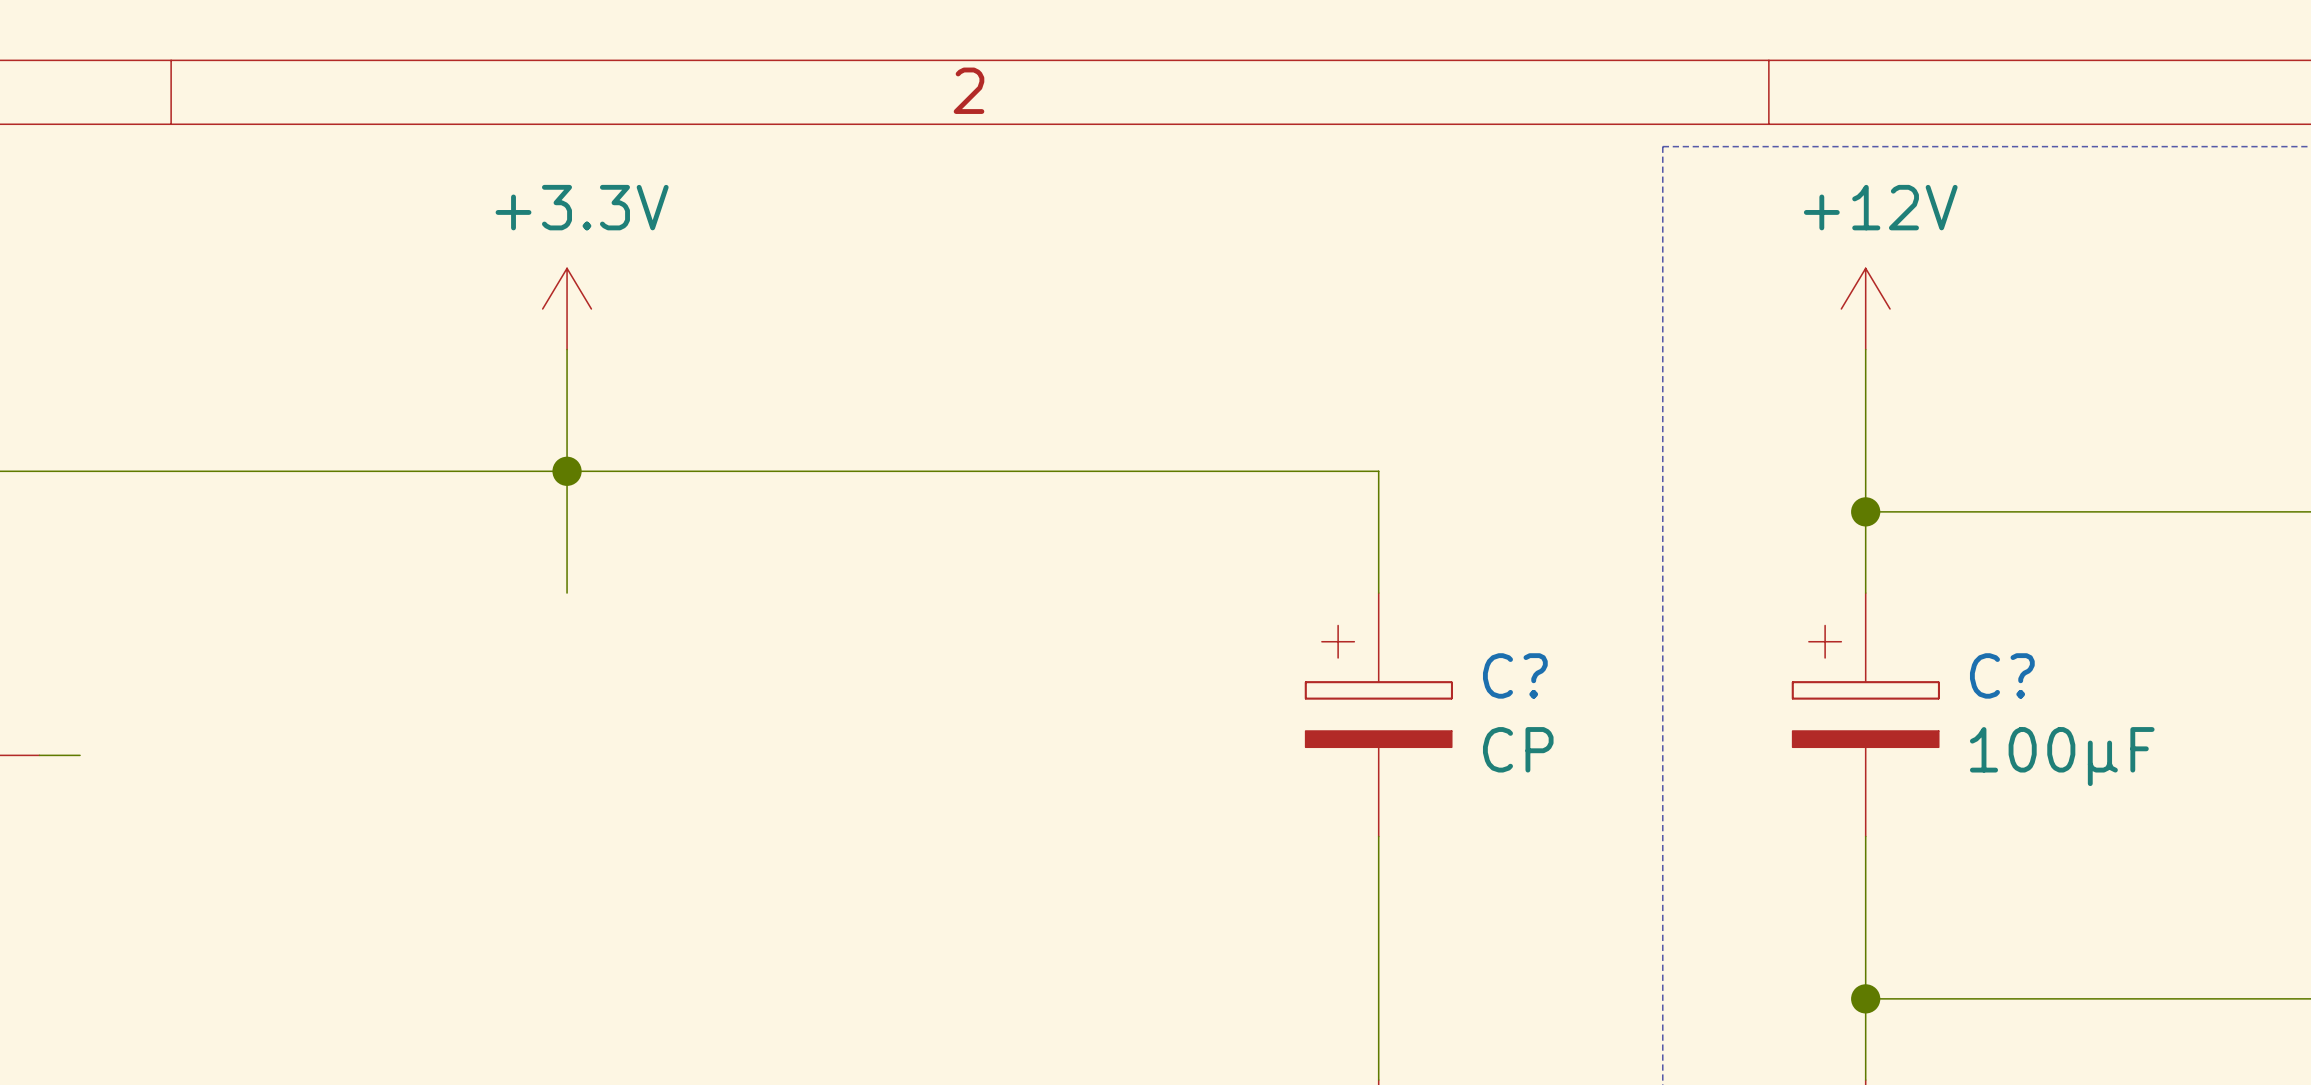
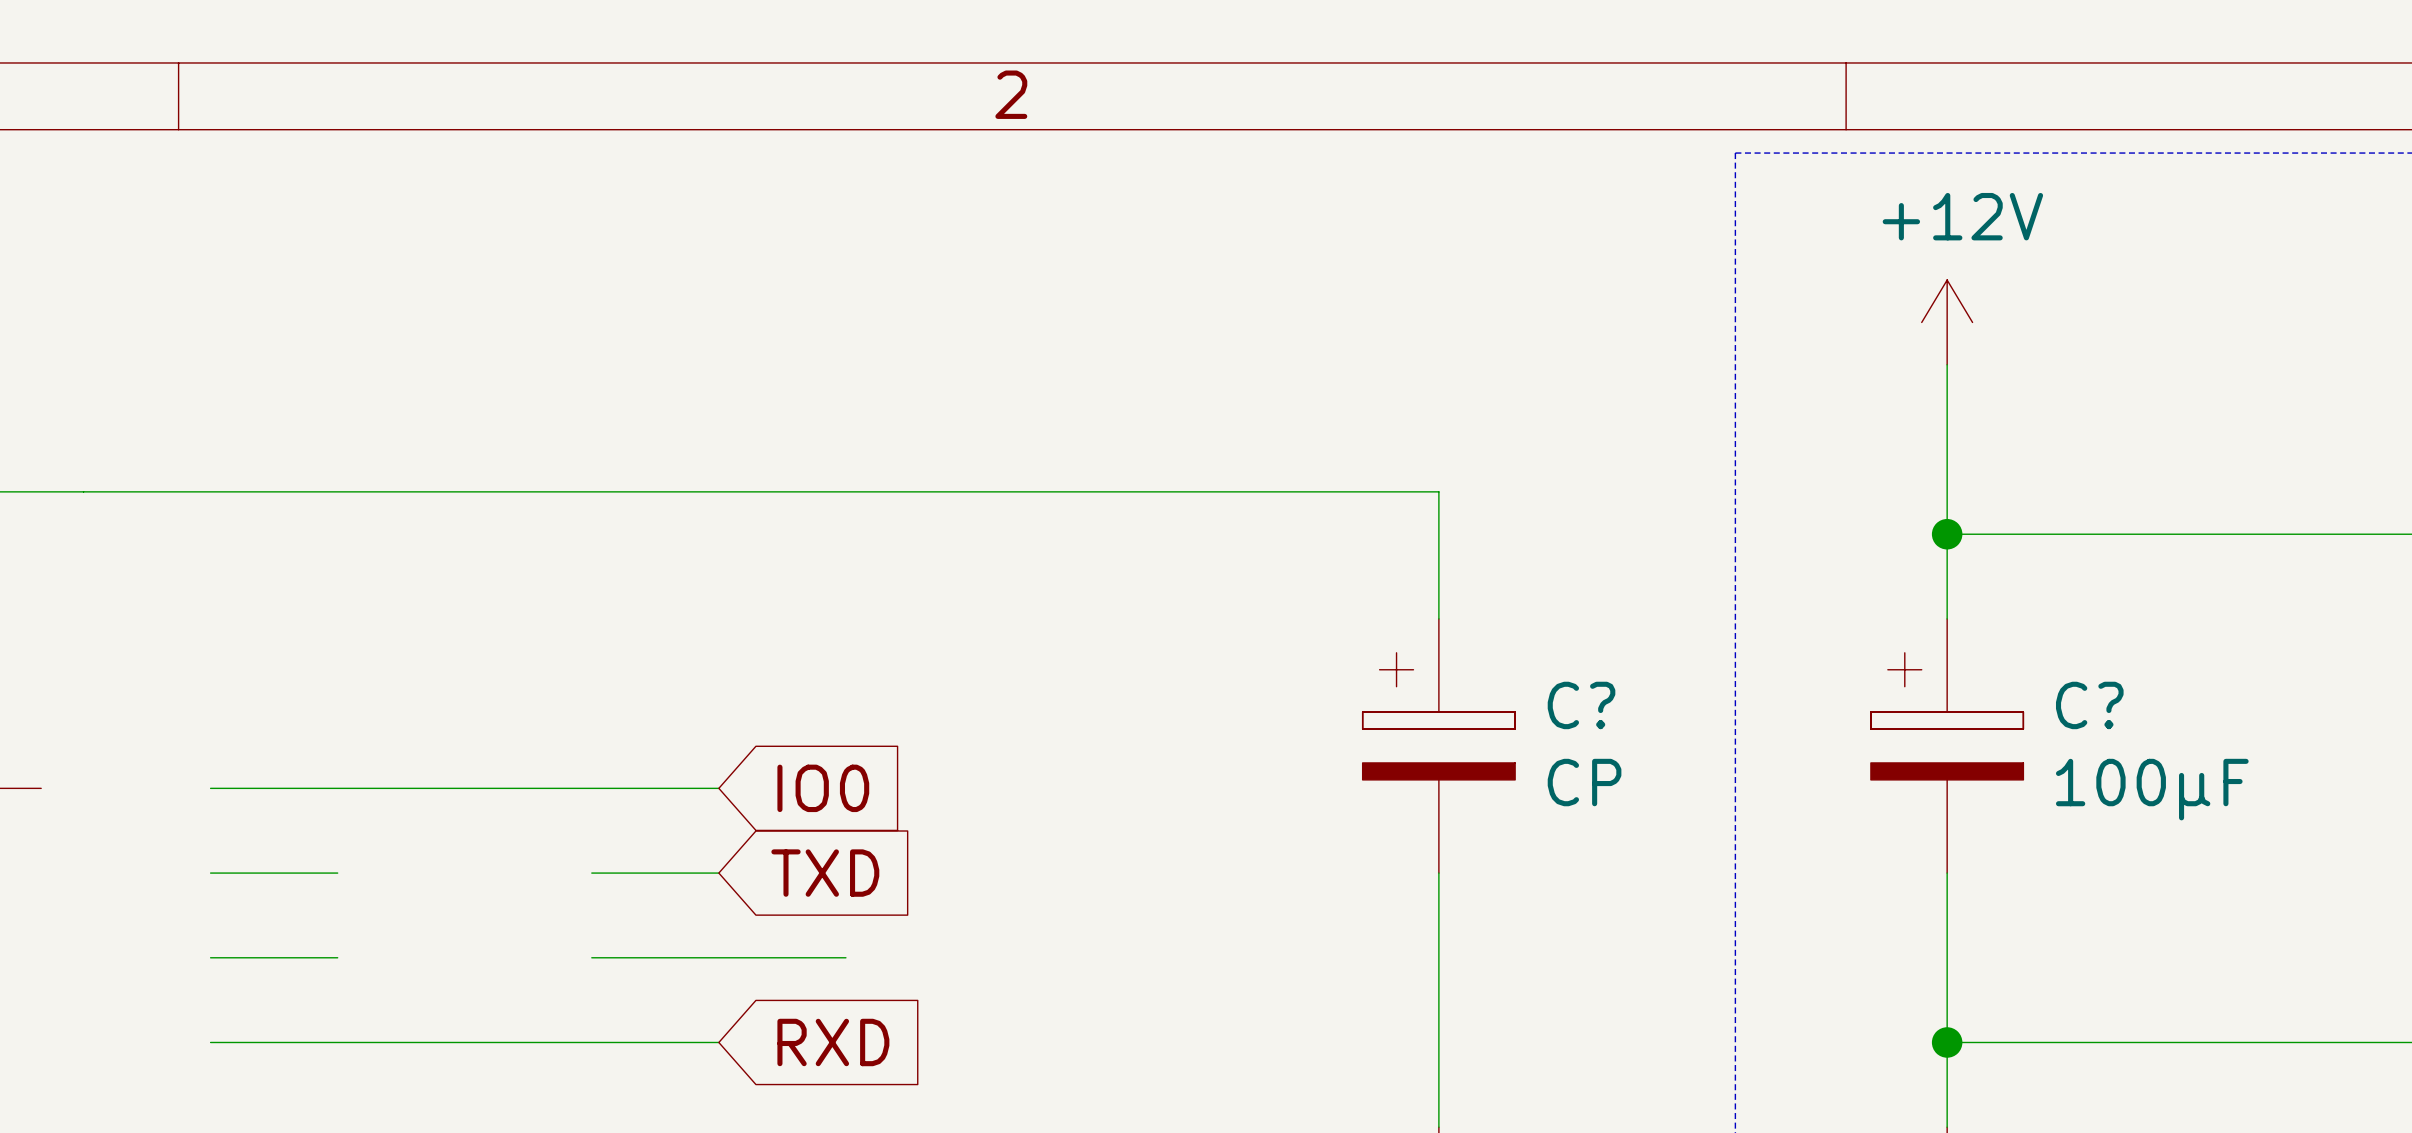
power symbol: +3.3V (567, 308) -> none
wire: (567, 349) (567, 593) -> none
junction: (567, 471) -> none
wire: (39, 755) (80, 755) -> none
wire: none -> (210, 788) (718, 788)
global label: none -> IO0 (823, 788)
wire: none -> (210, 873) (337, 873)
wire: none -> (591, 873) (718, 873)
global label: none -> TXD (825, 873)
wire: none -> (210, 957) (337, 957)
wire: none -> (591, 957) (845, 957)
wire: none -> (210, 1042) (718, 1042)
global label: none -> RXD (833, 1042)

